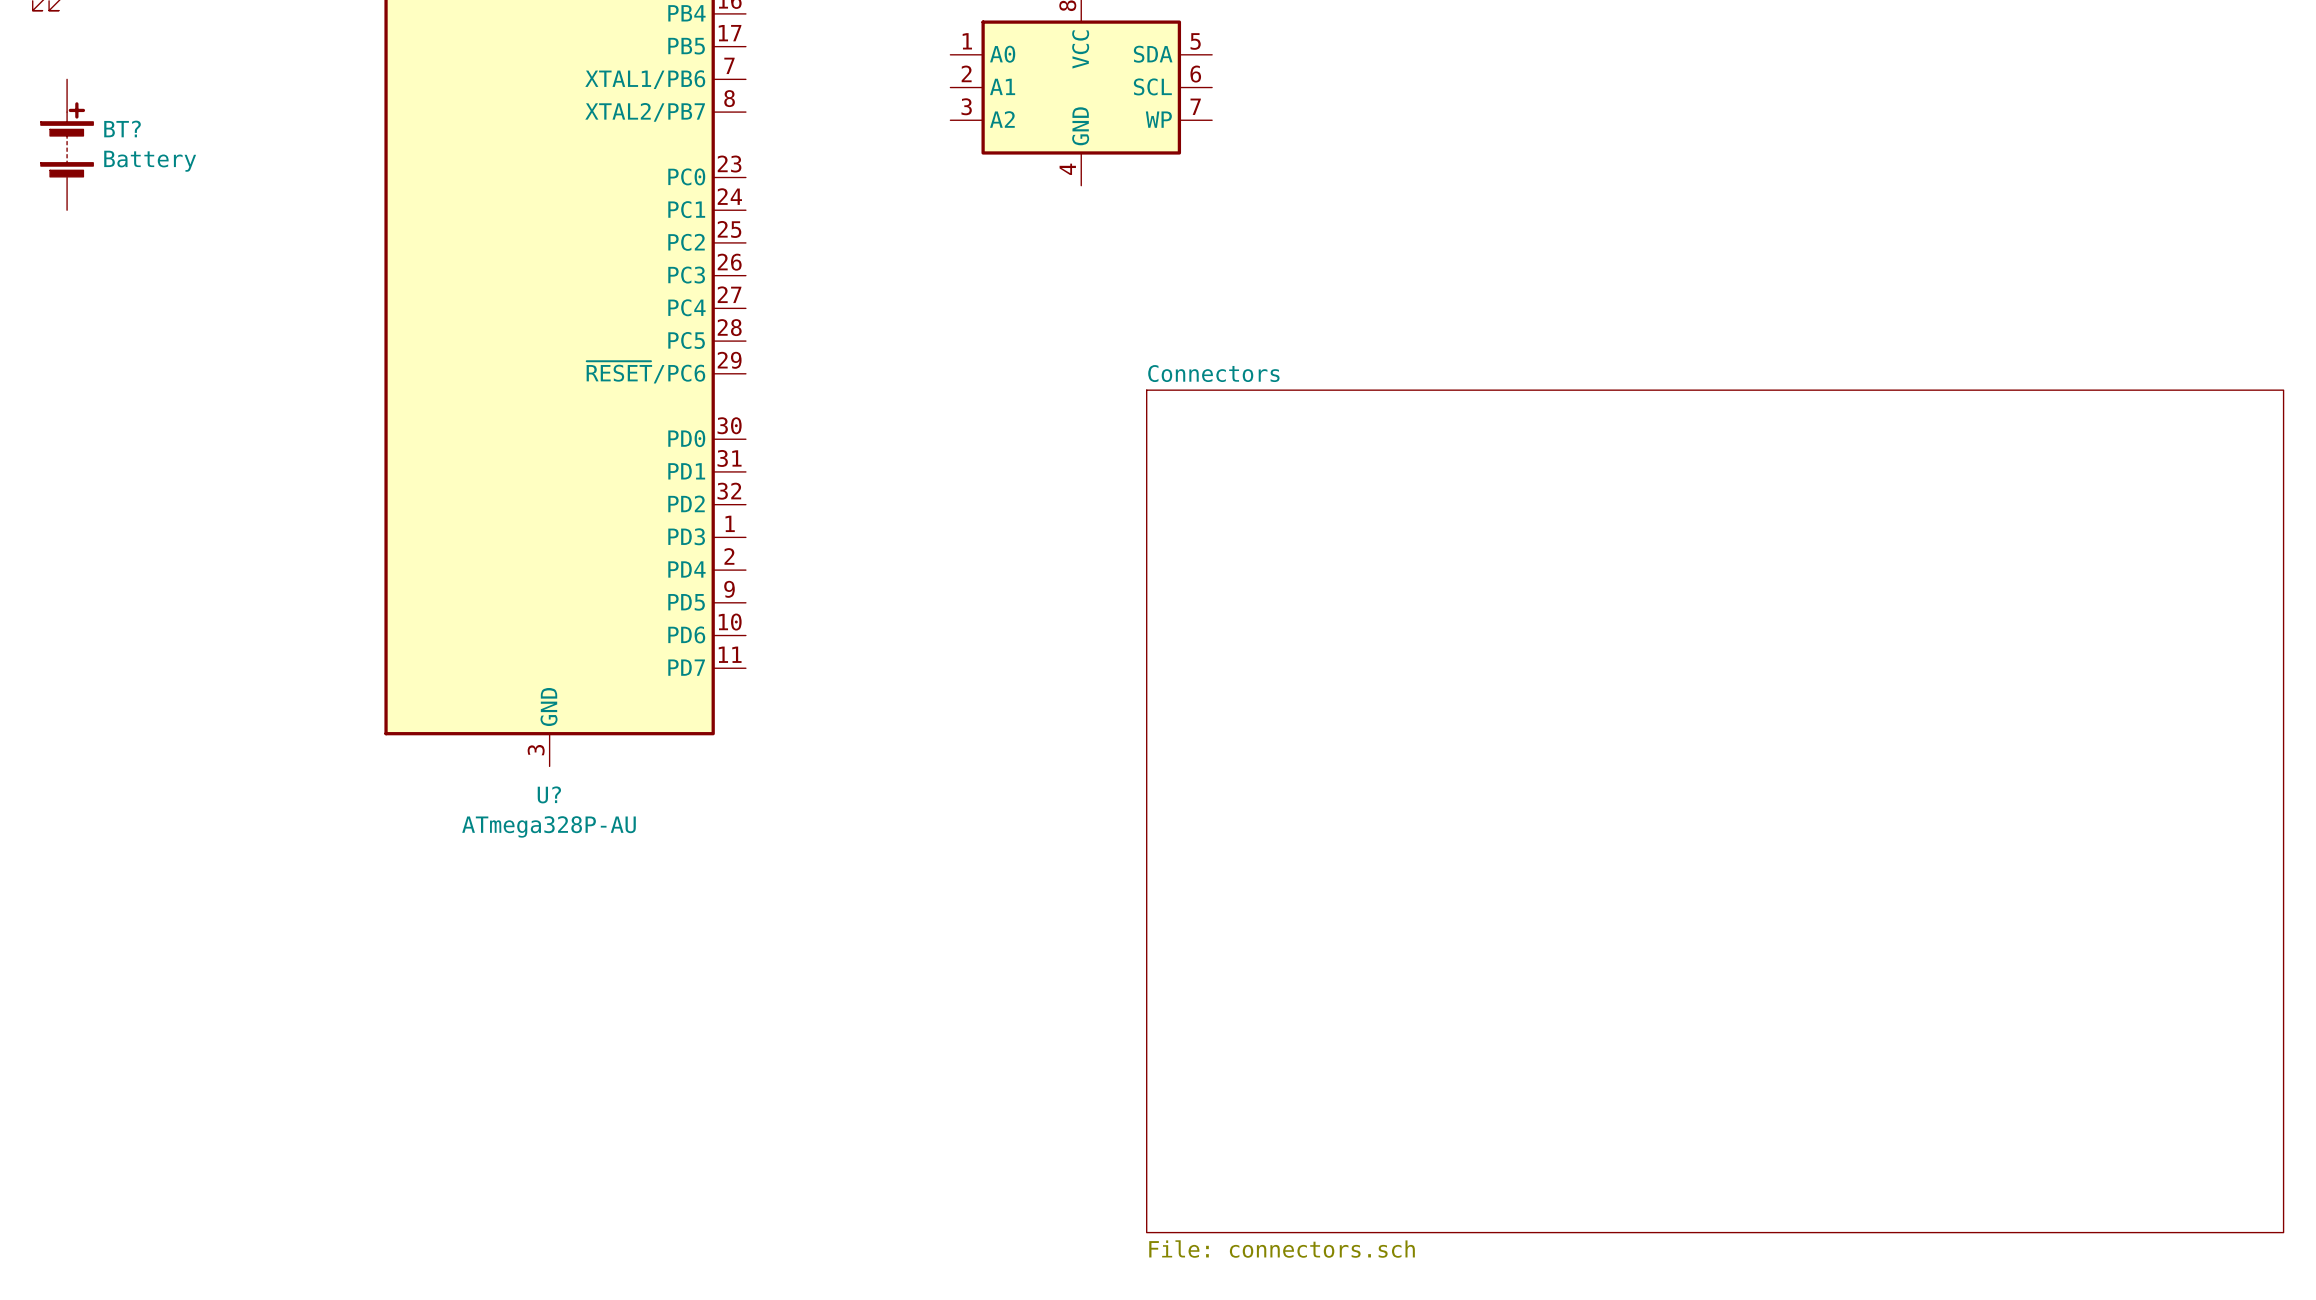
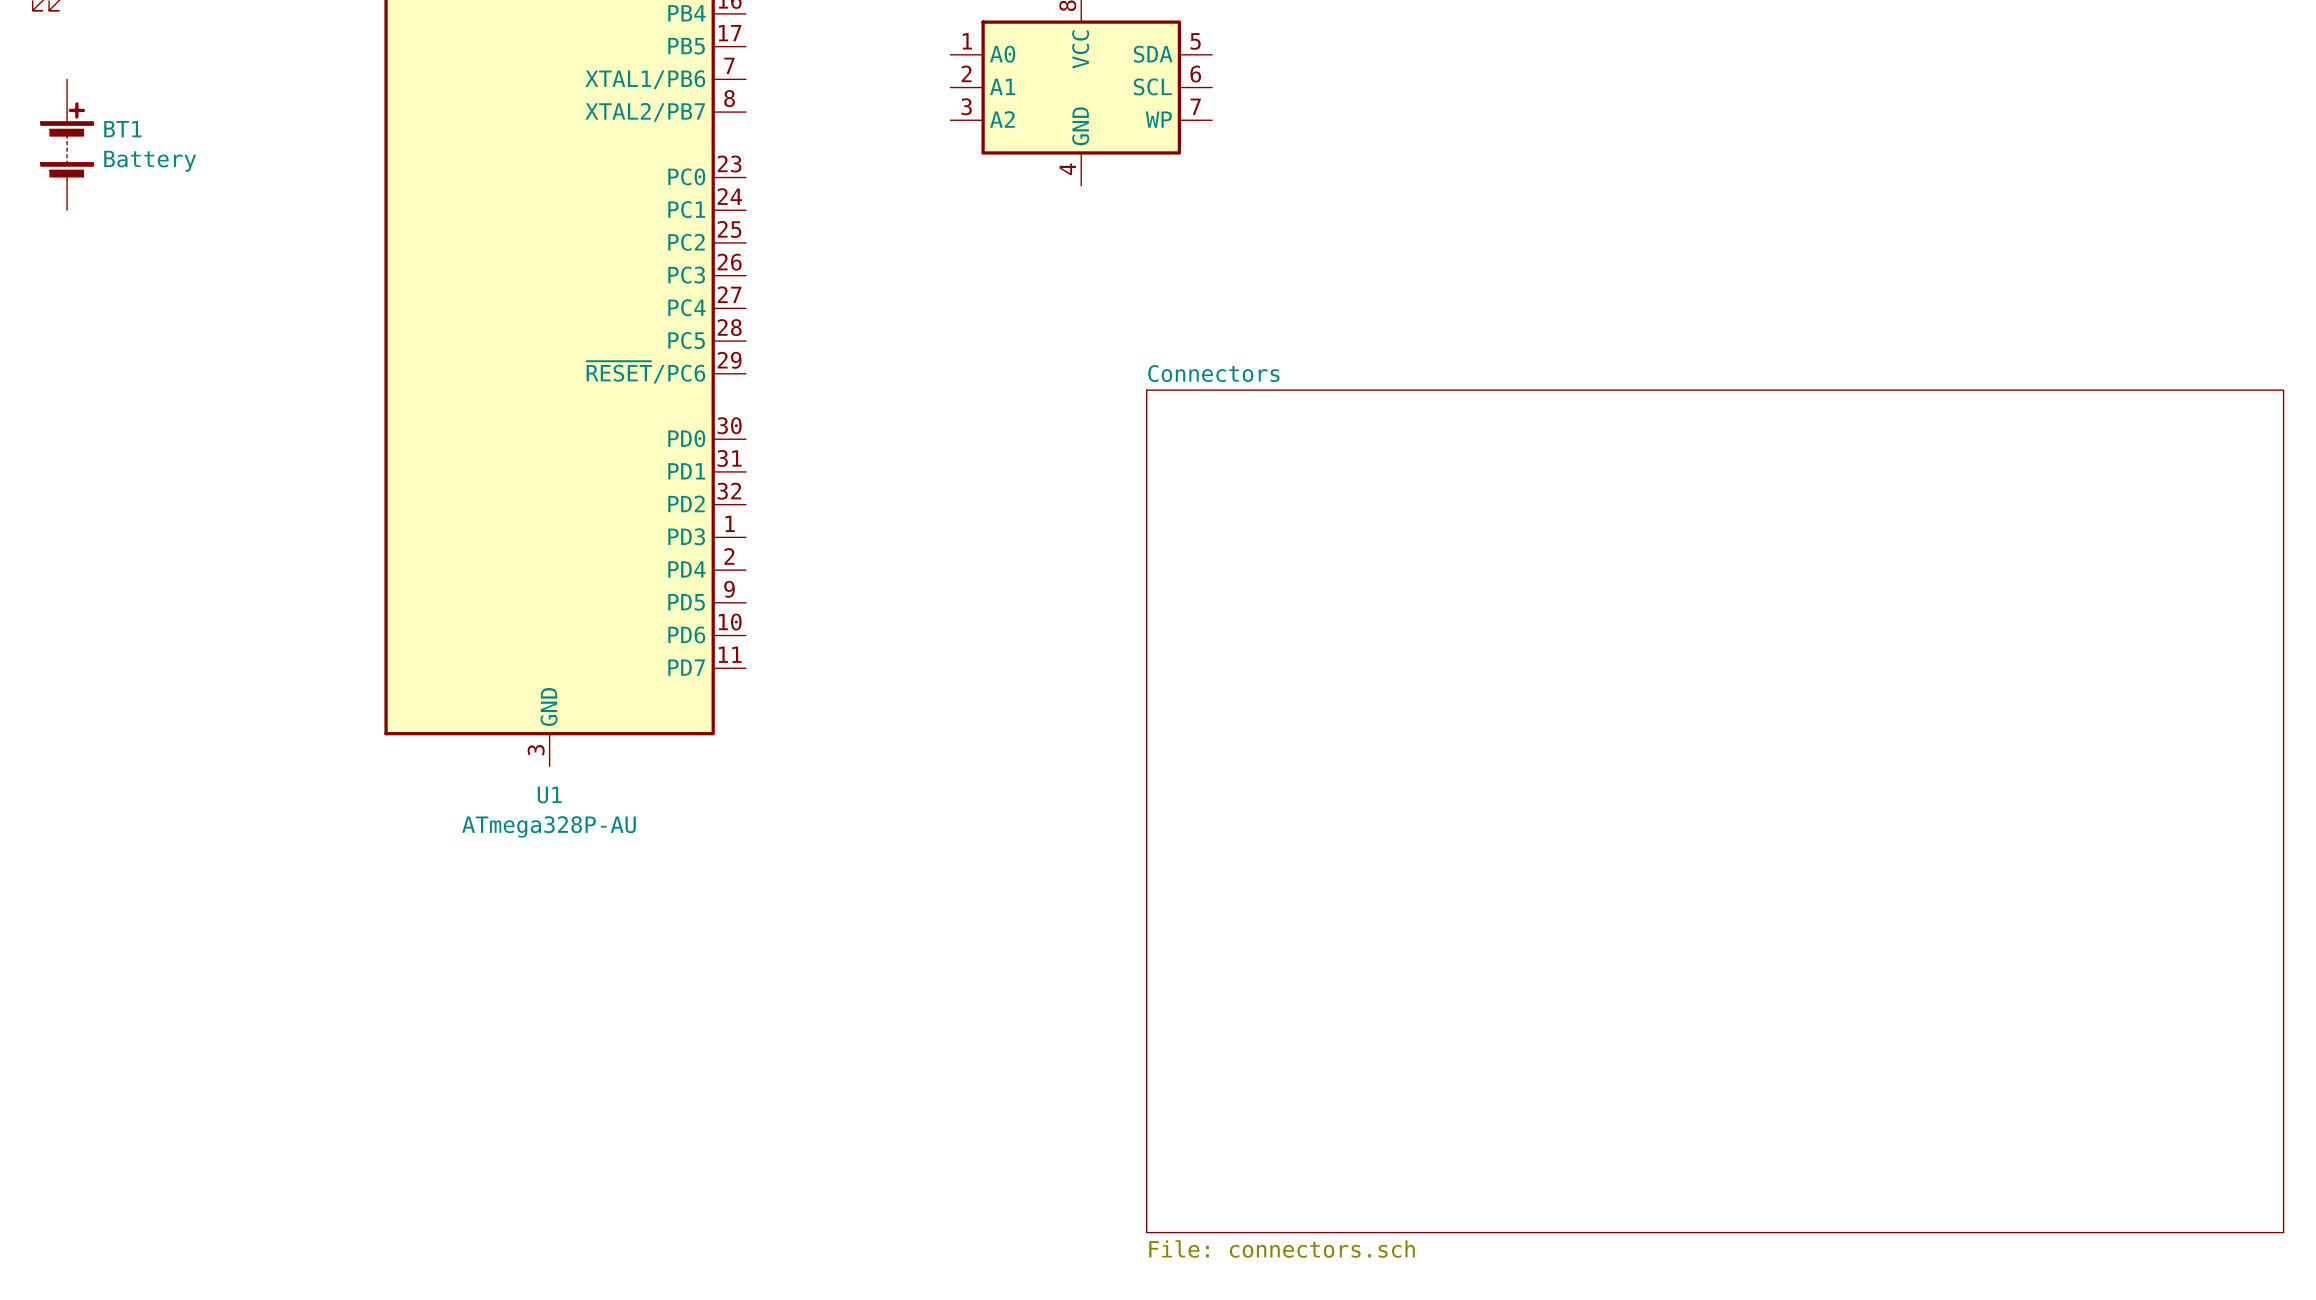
BT? name: BT? (122, 128) -> BT1 (122, 129)
U? name: U? (549, 794) -> U1 (549, 795)

